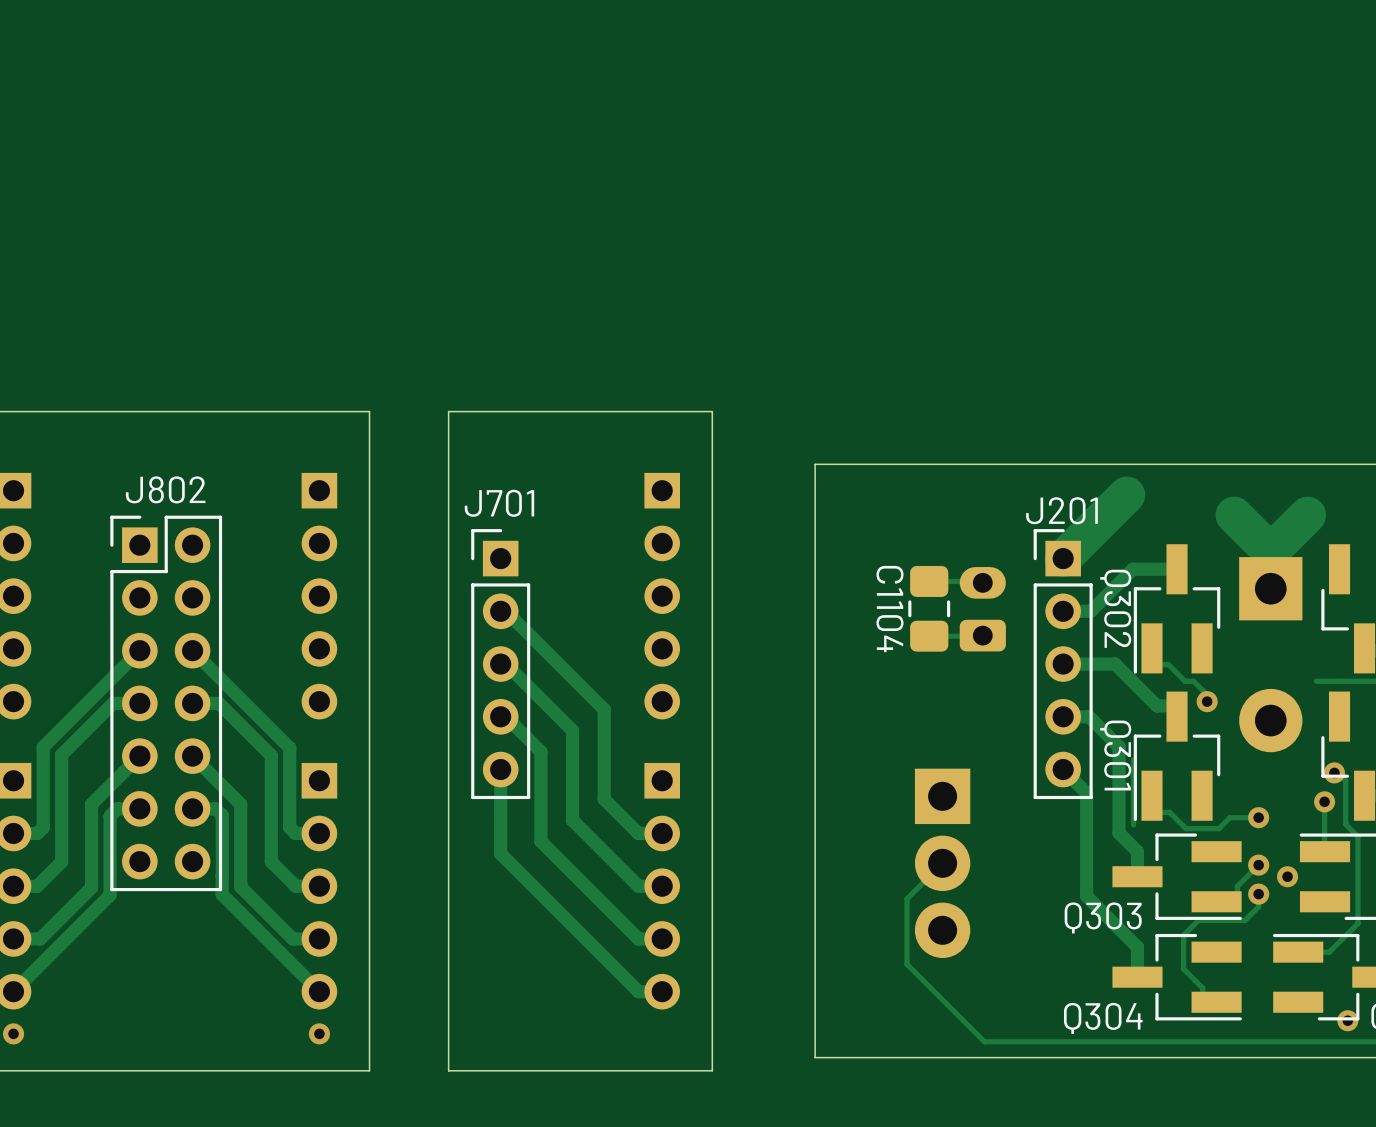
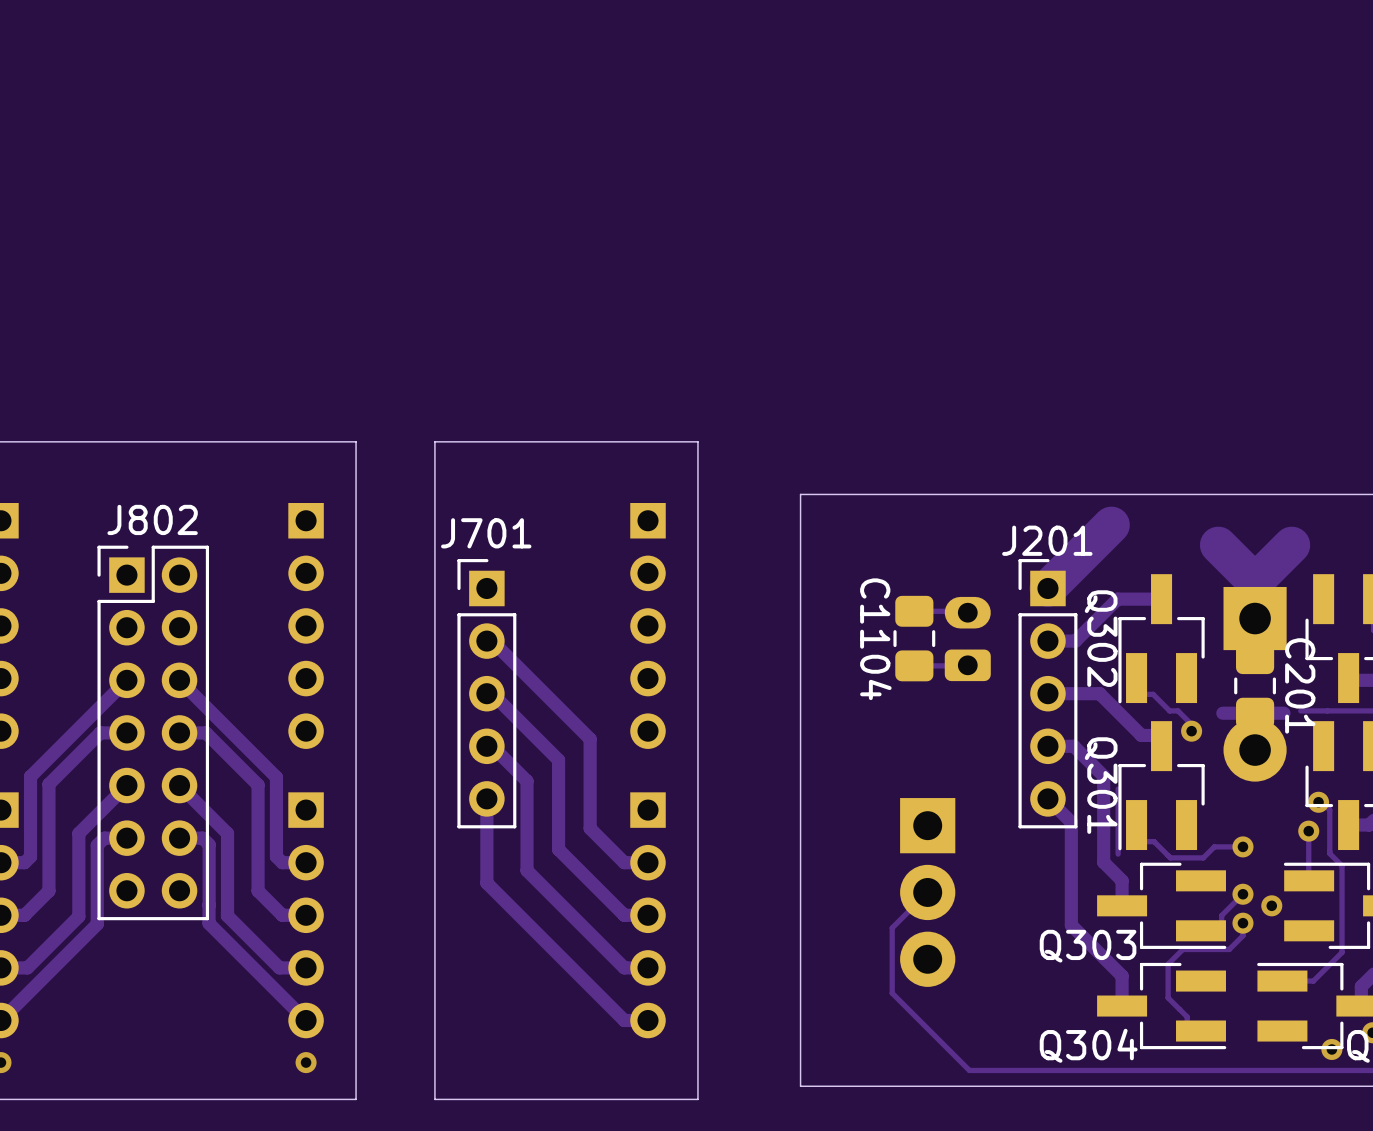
C201: none -> (1255, 685)
track: none -> (1284, 713) (1222, 713)

